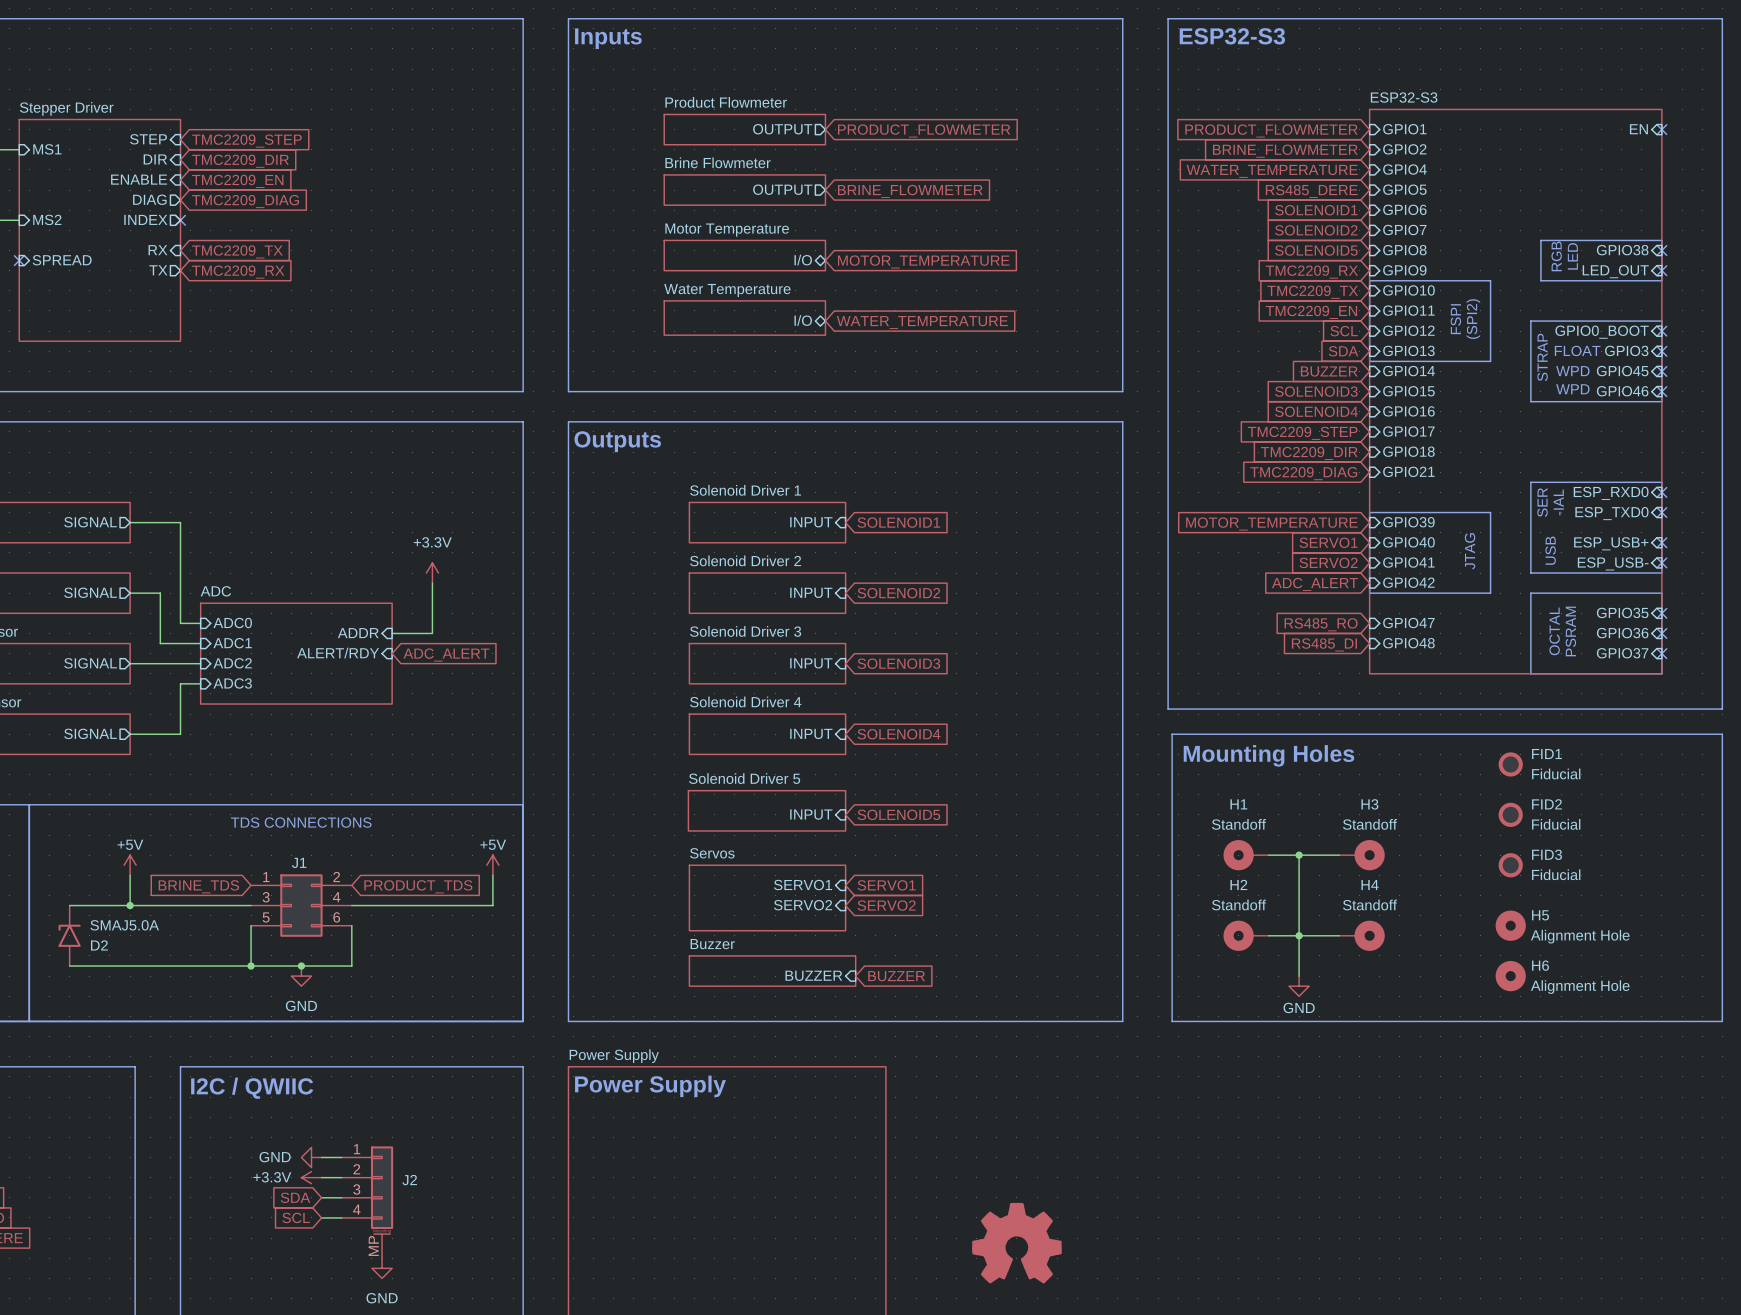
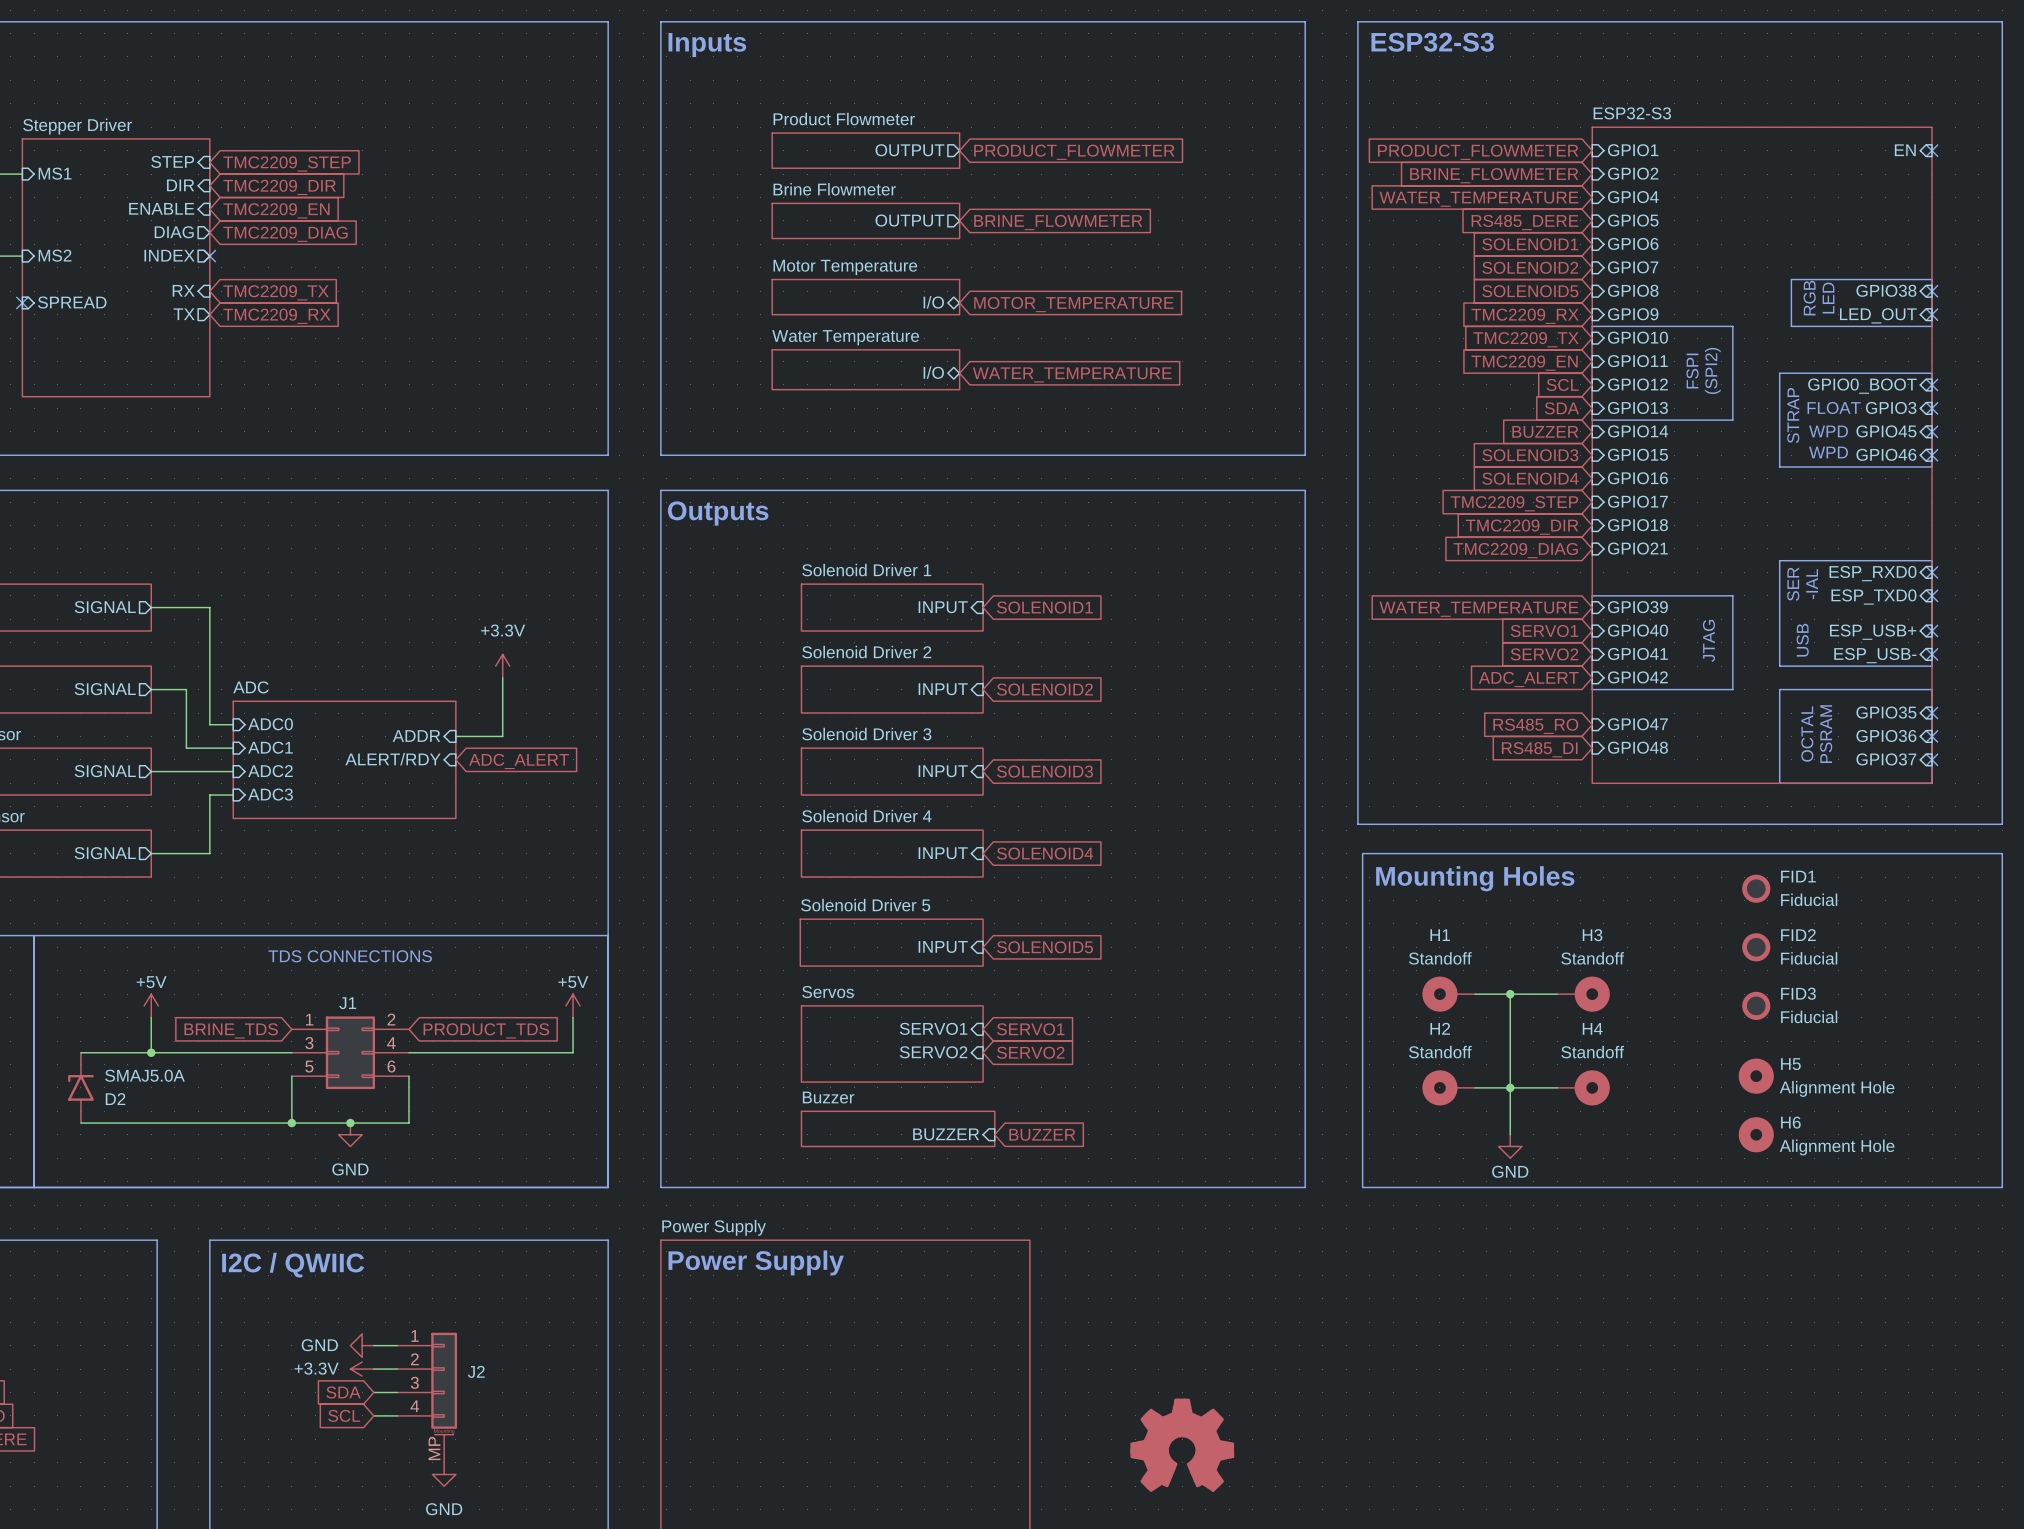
global label: MOTOR_TEMPERATURE (1271, 523) -> WATER_TEMPERATURE (1478, 609)

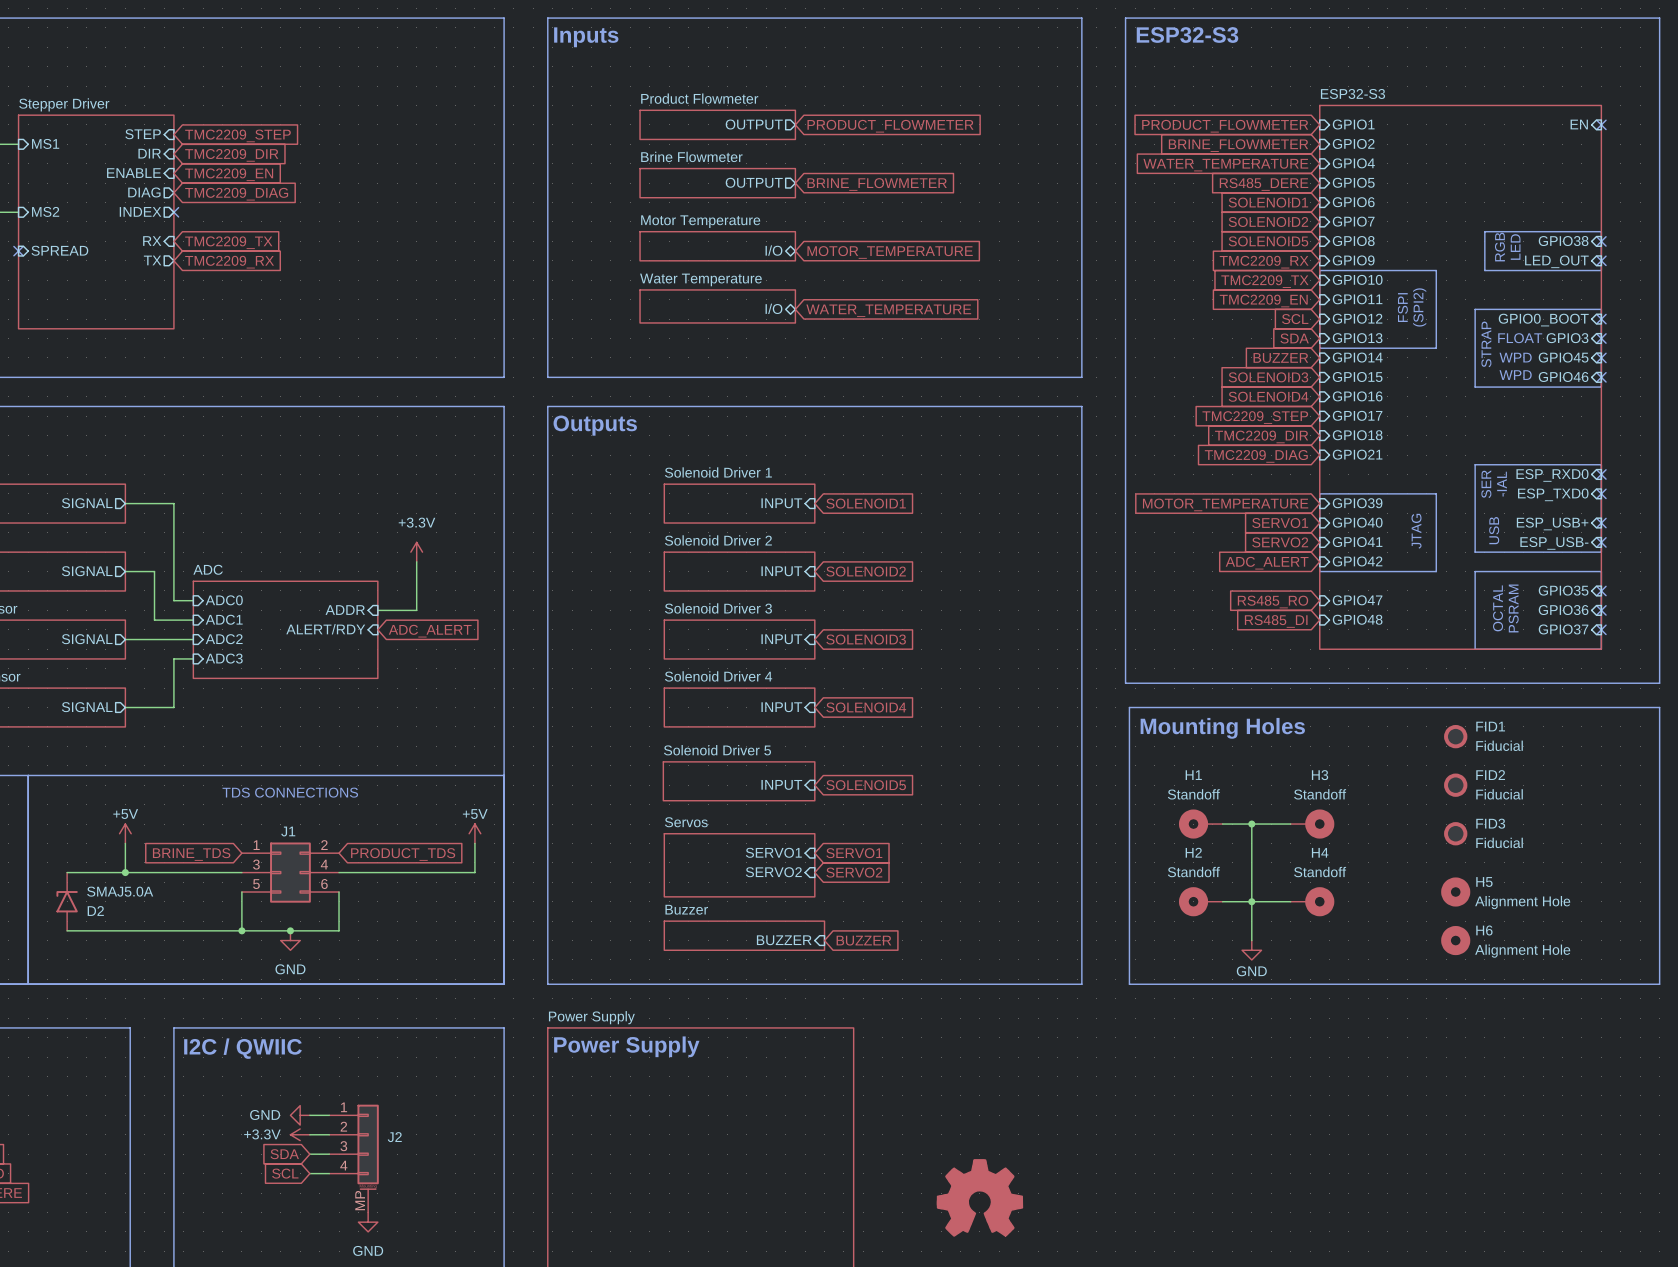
global label: WATER_TEMPERATURE (1478, 609) -> MOTOR_TEMPERATURE (1225, 504)

